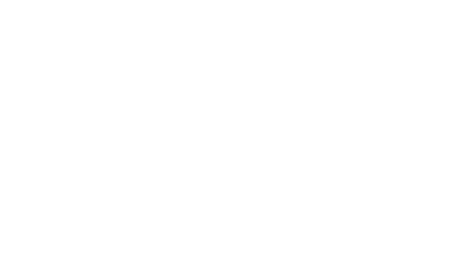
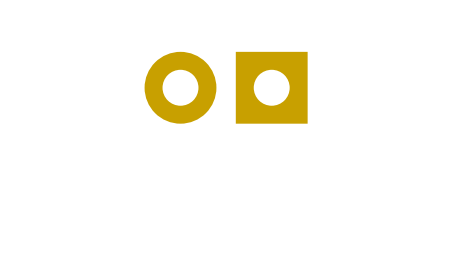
part: none -> (226, 87)

